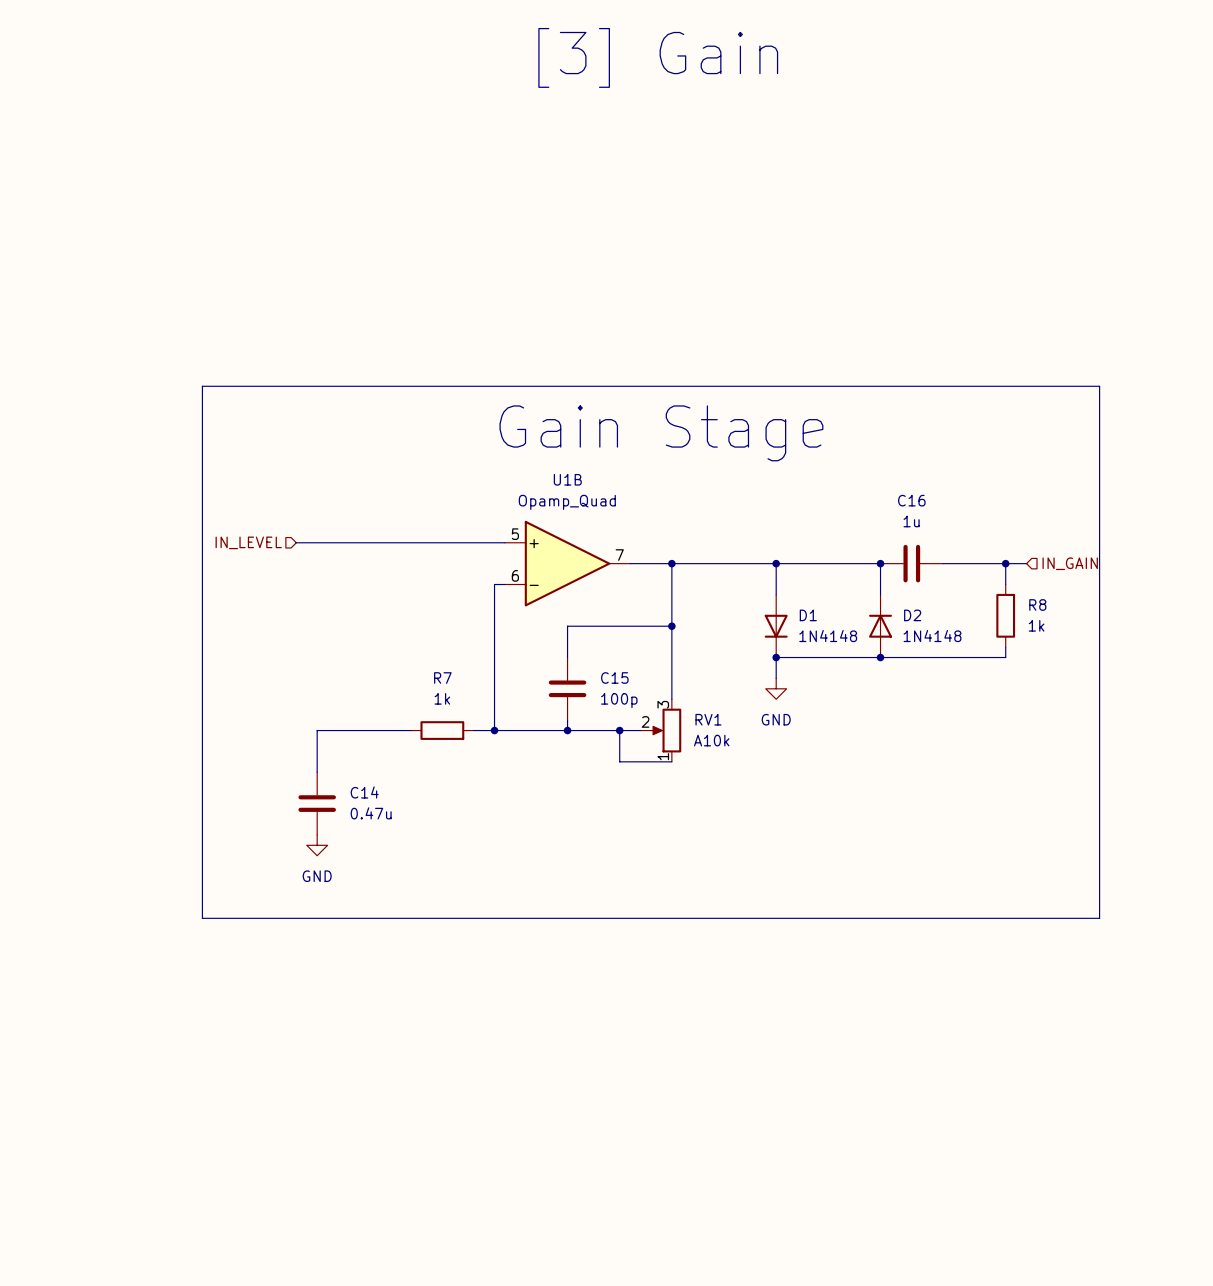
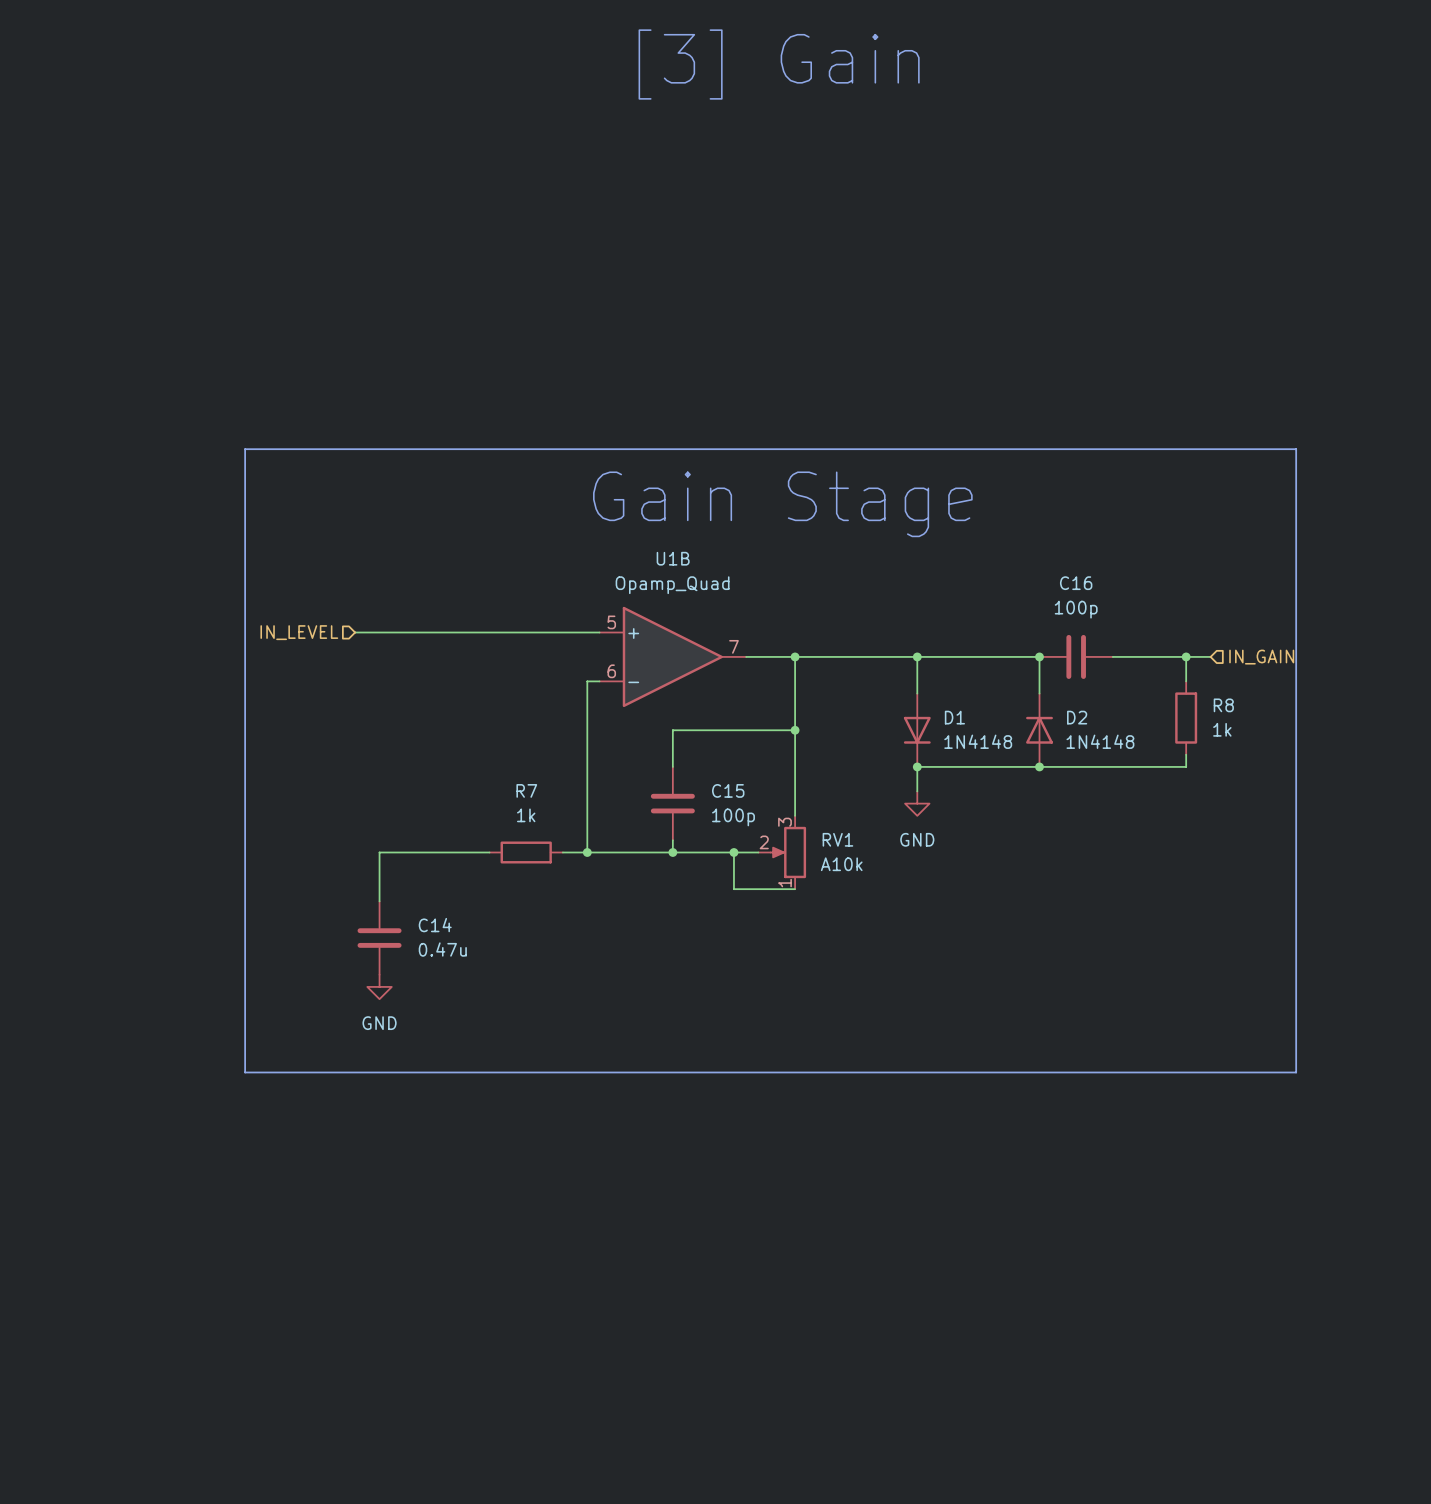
C16 value: 1u (911, 521) -> 100p (1076, 609)

